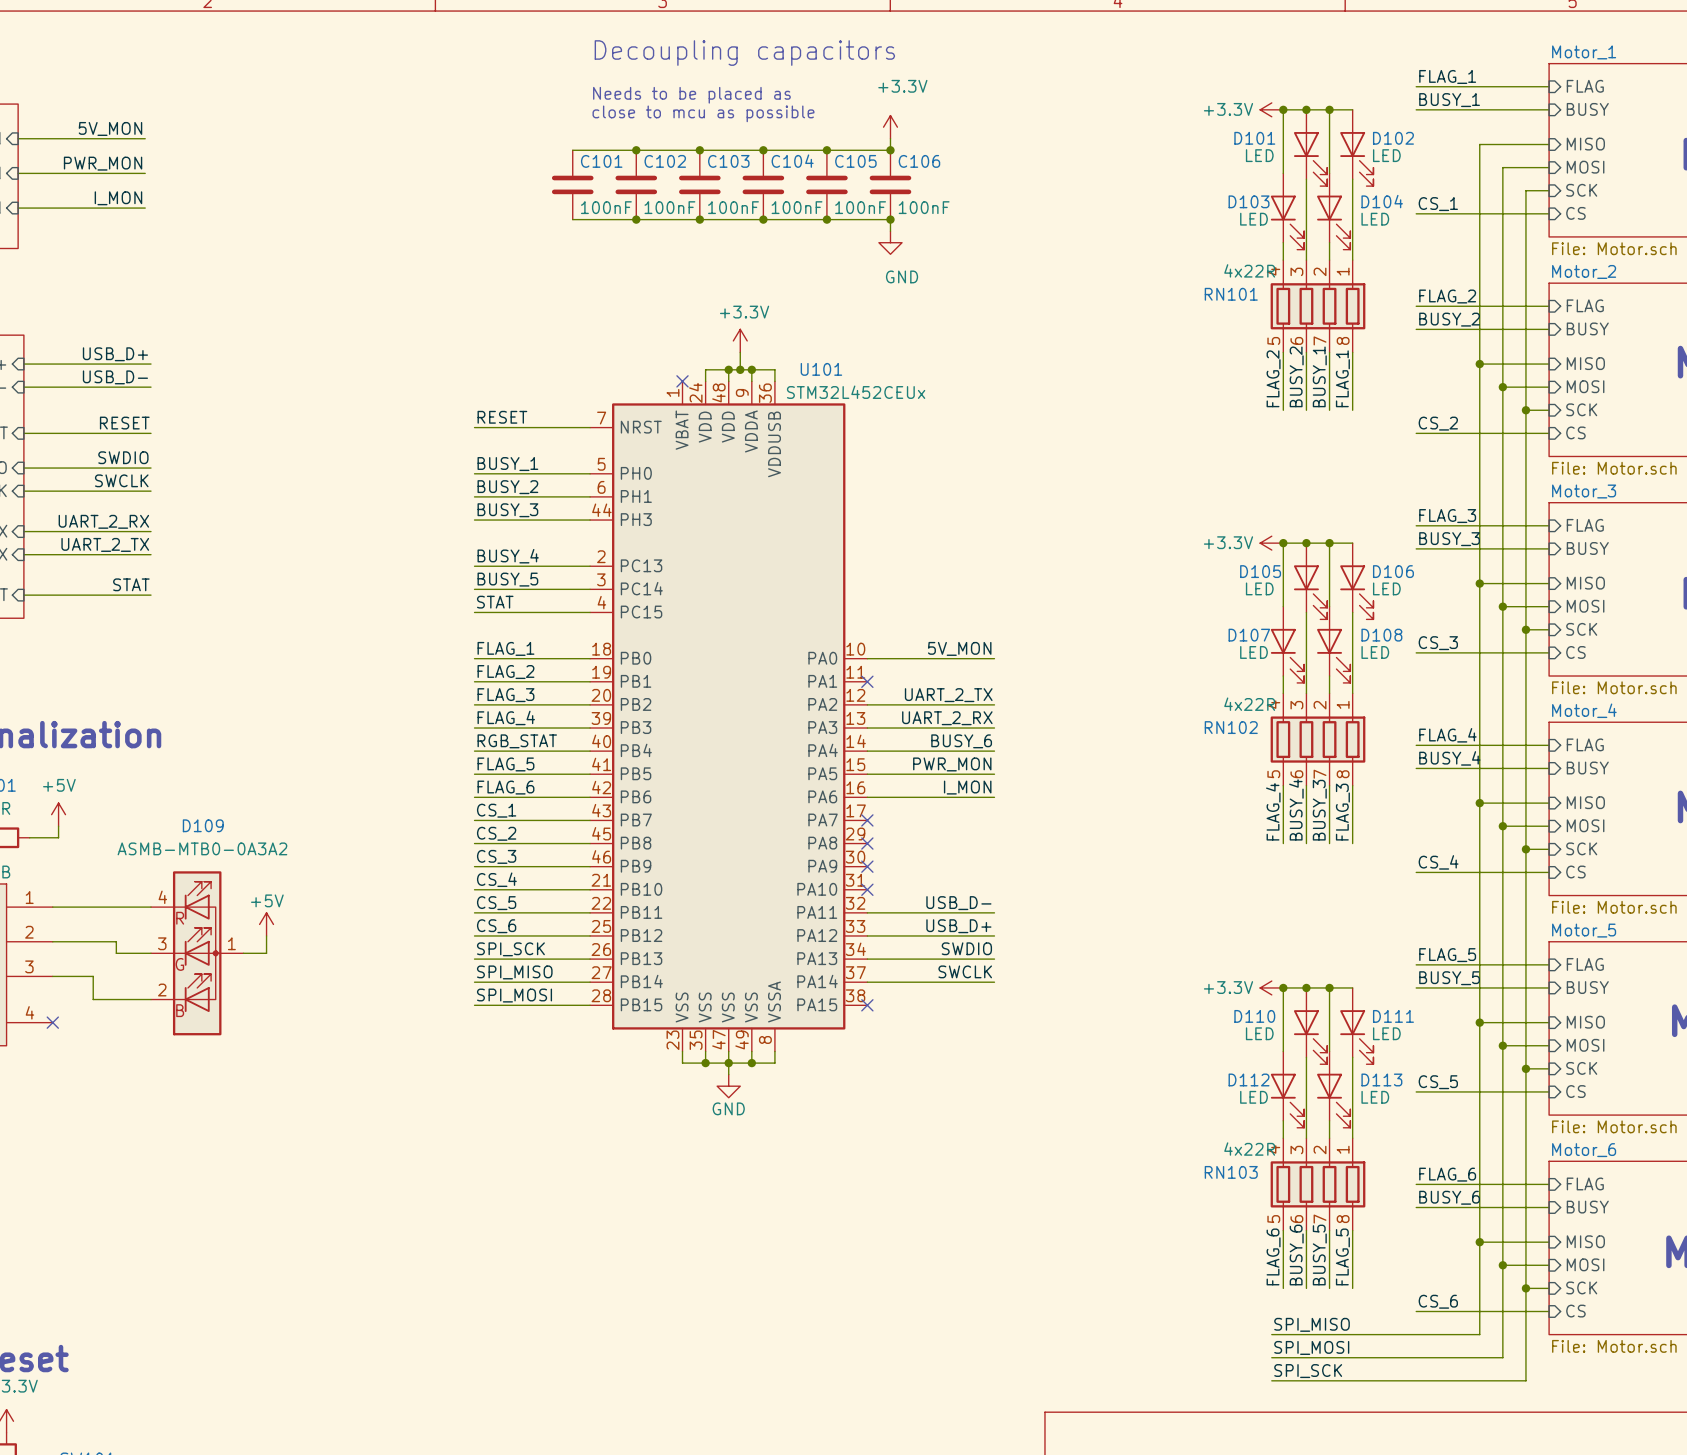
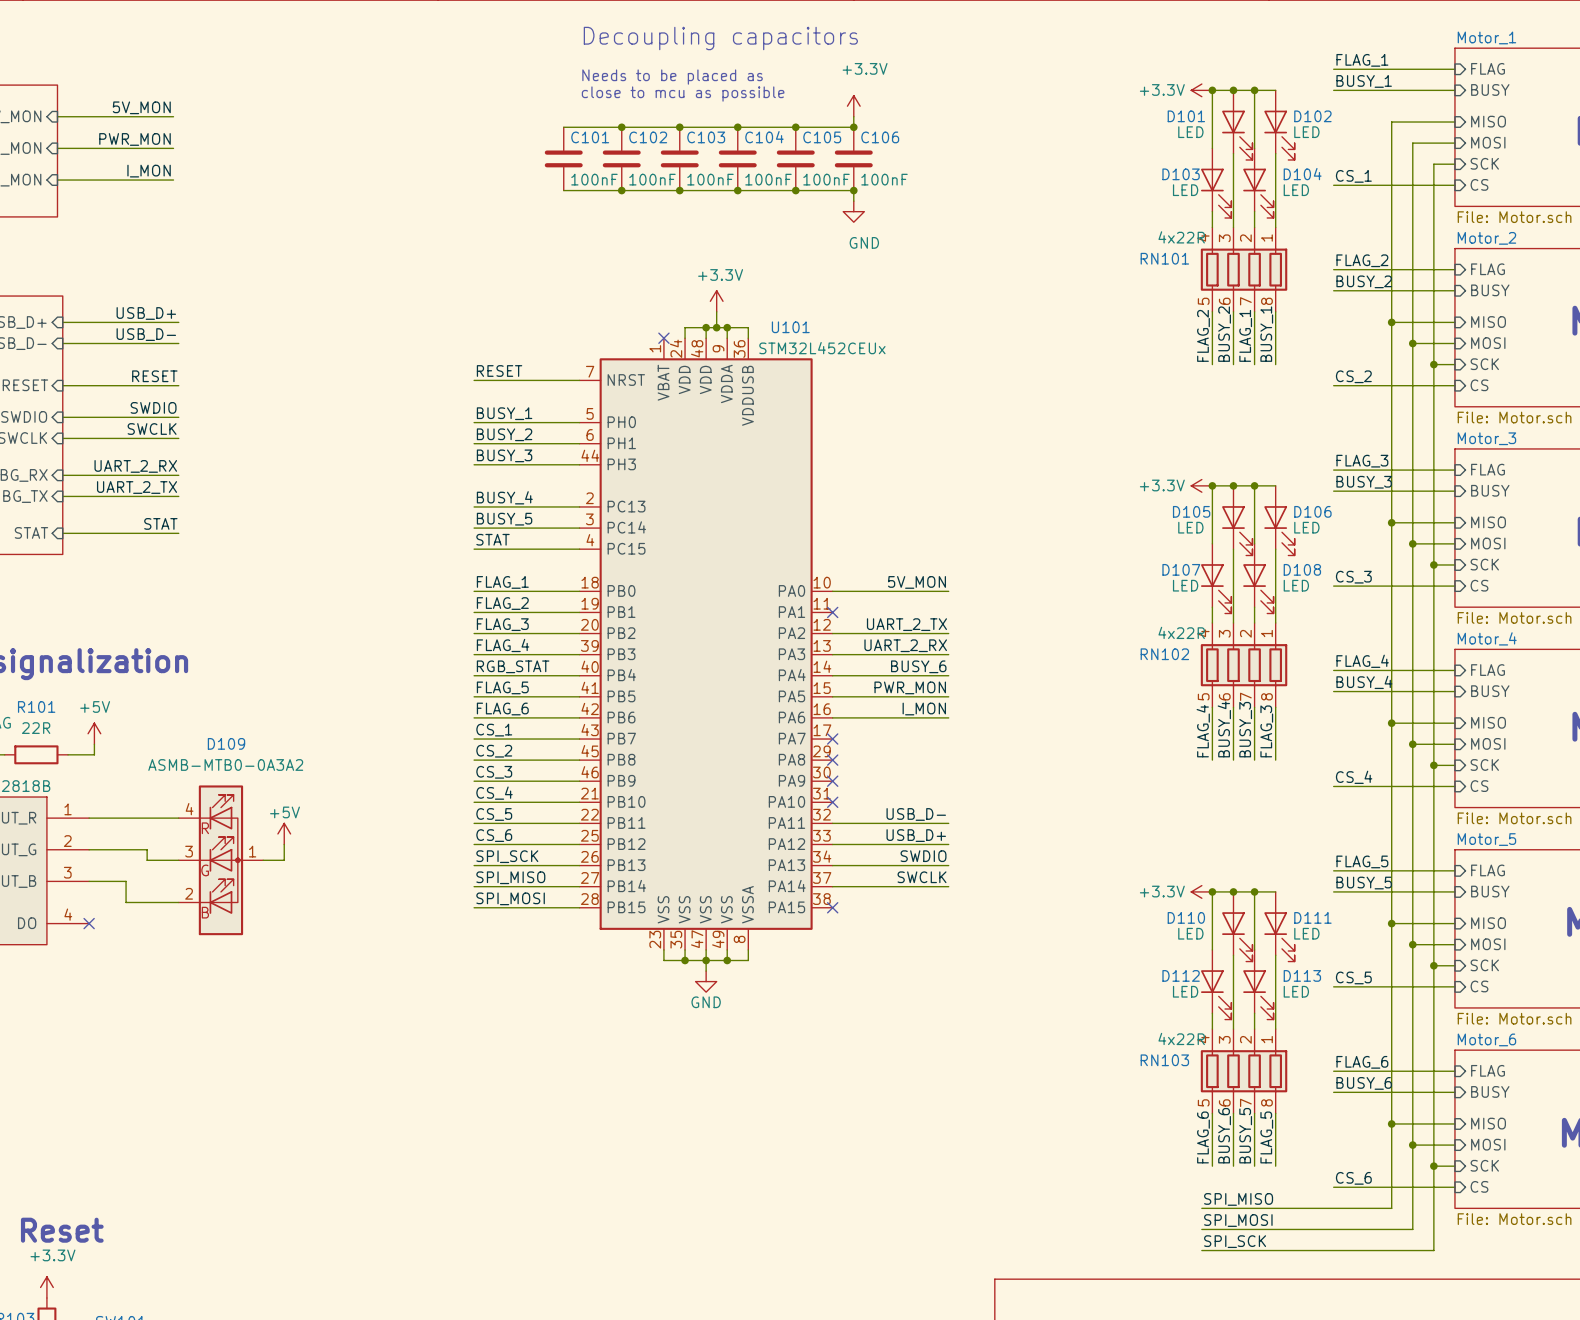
label: BUSY_1 (1319, 376) -> FLAG_1 (1245, 335)
label: FLAG_1 (1342, 378) -> BUSY_1 (1266, 334)

